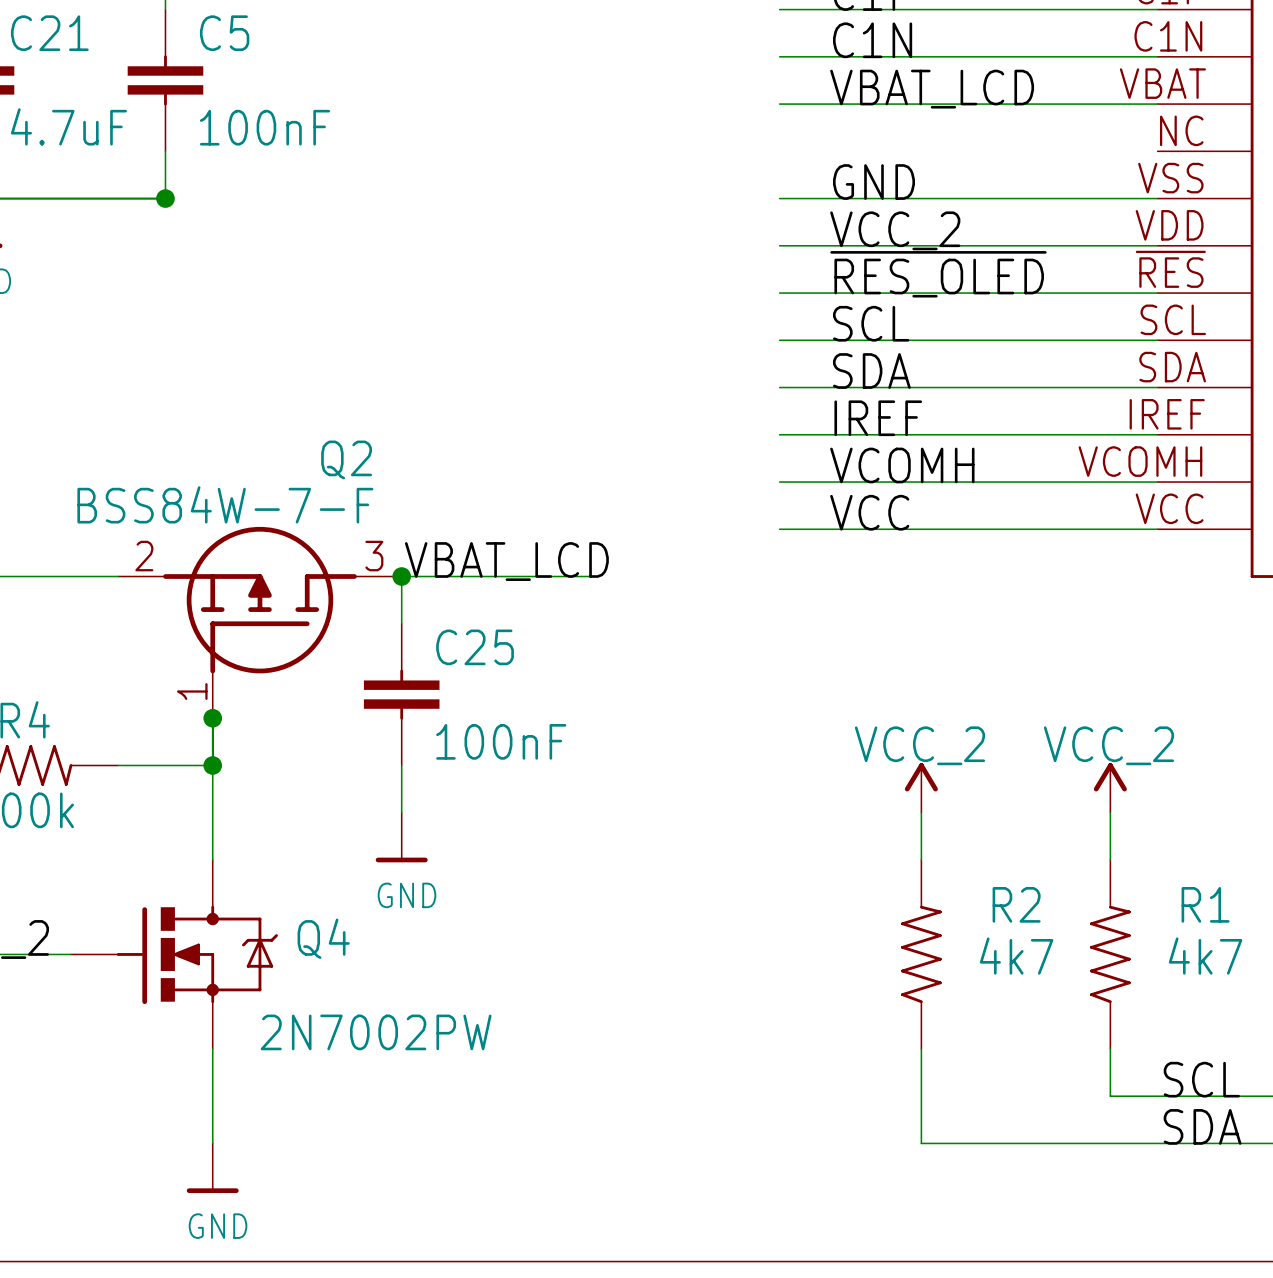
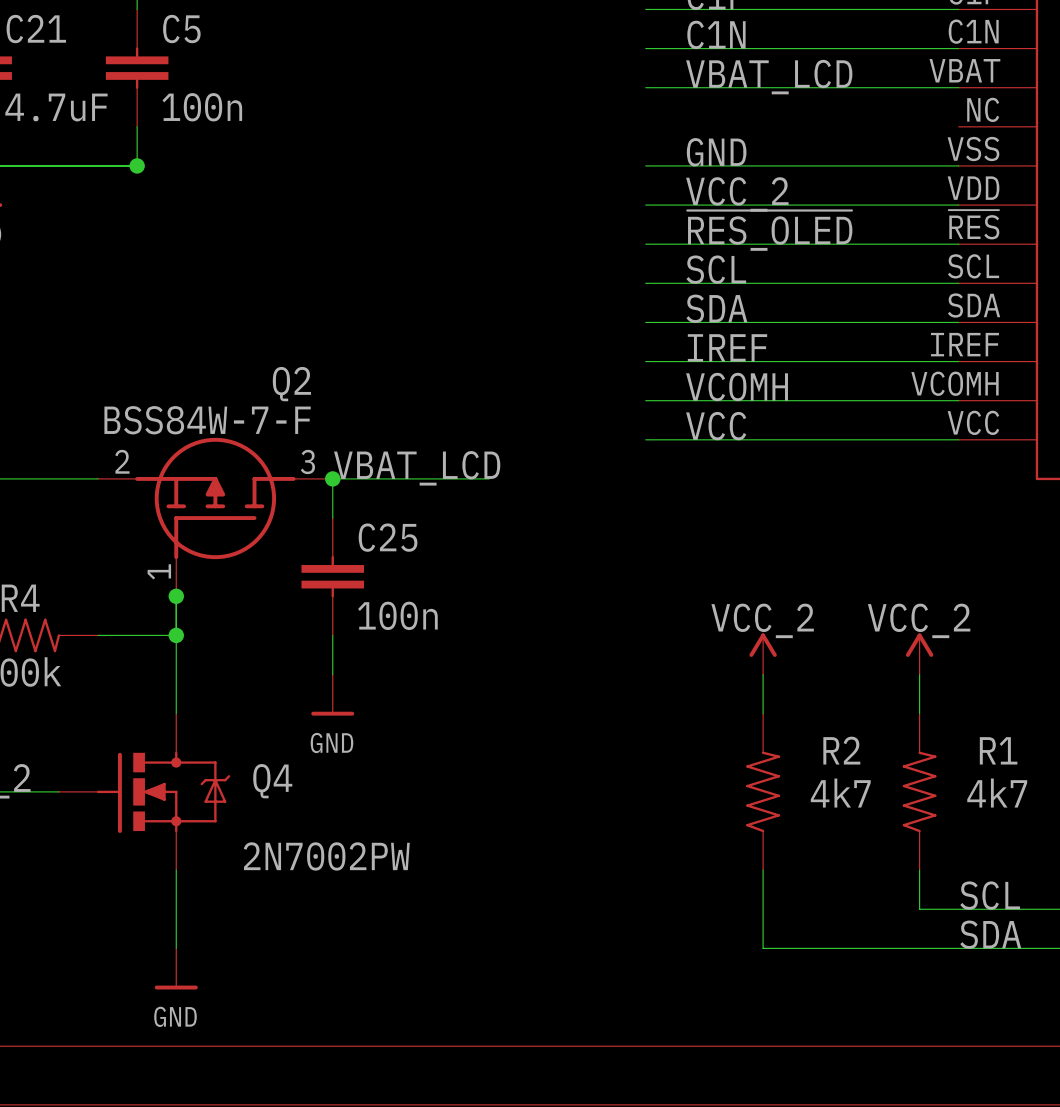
C5 value: 100nF (265, 127) -> 100n (202, 107)
C25 value: 100nF (501, 741) -> 100n (397, 615)

